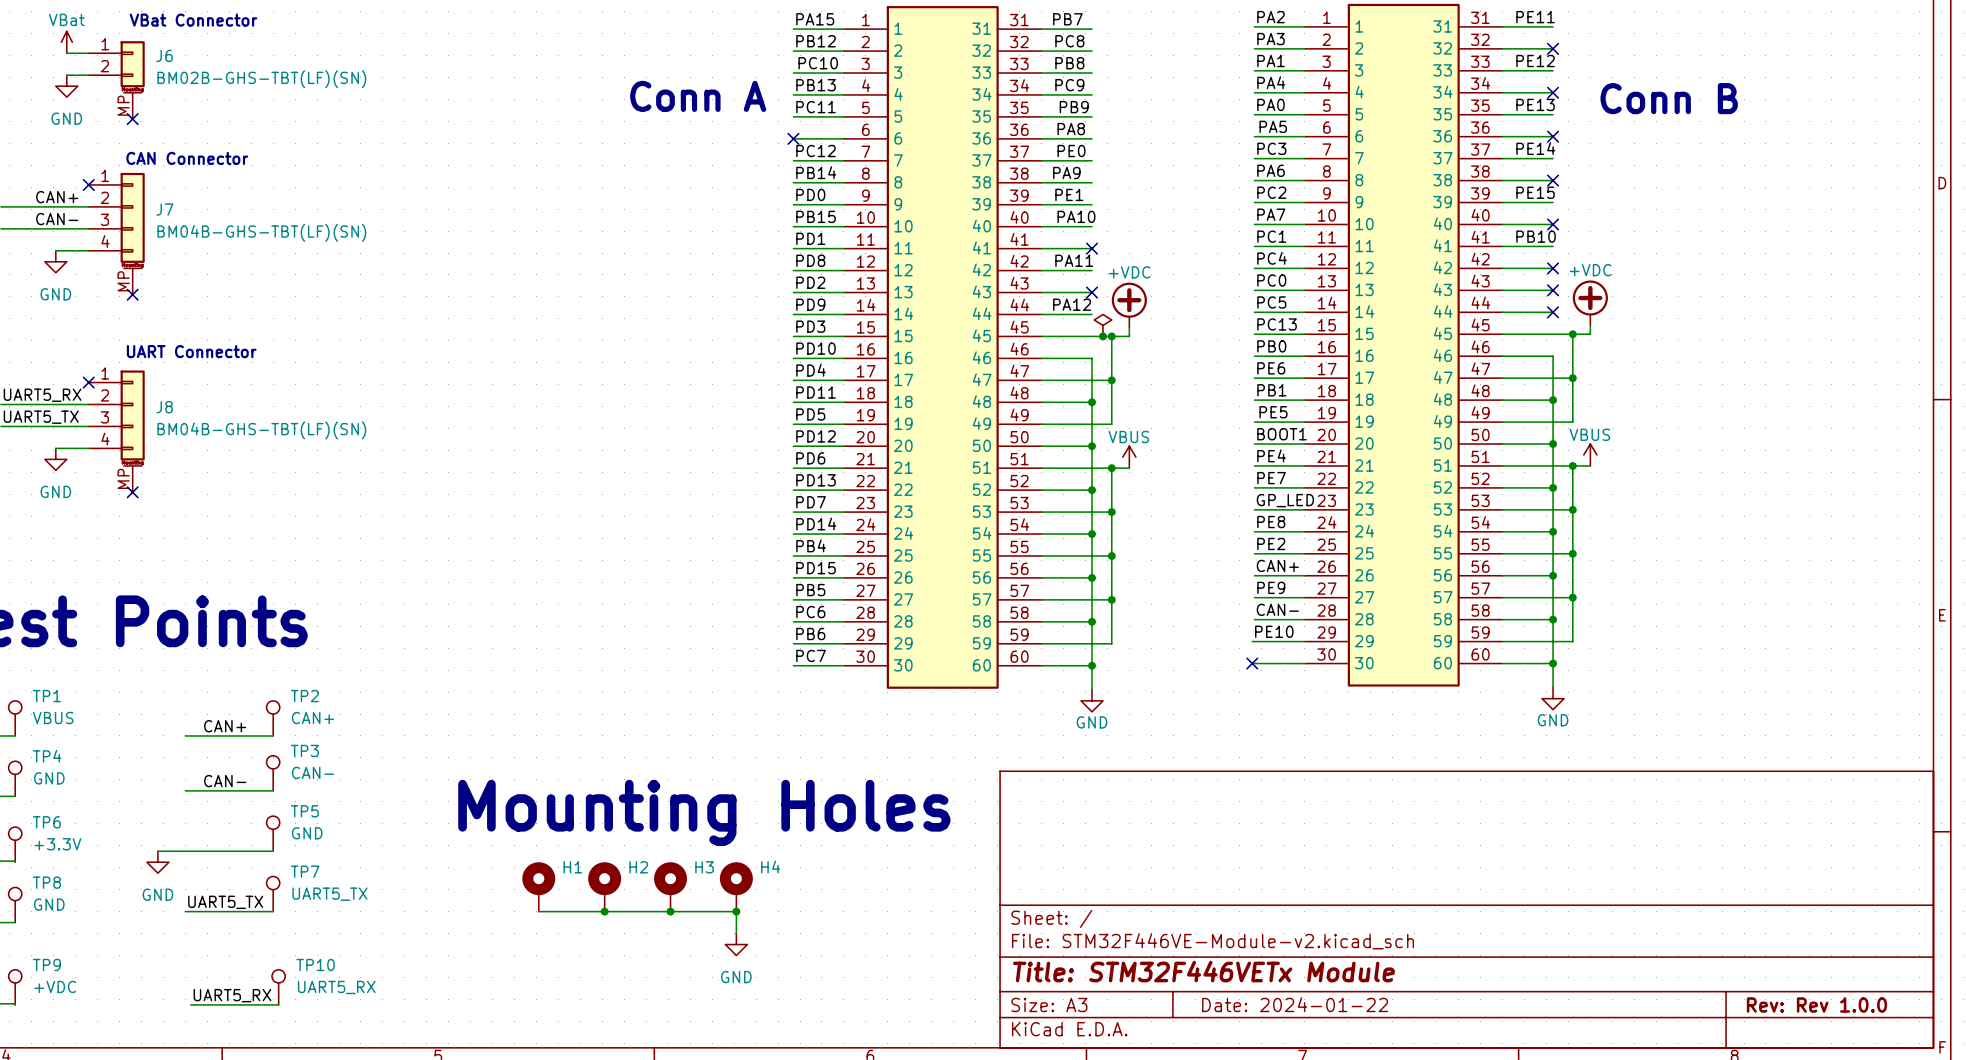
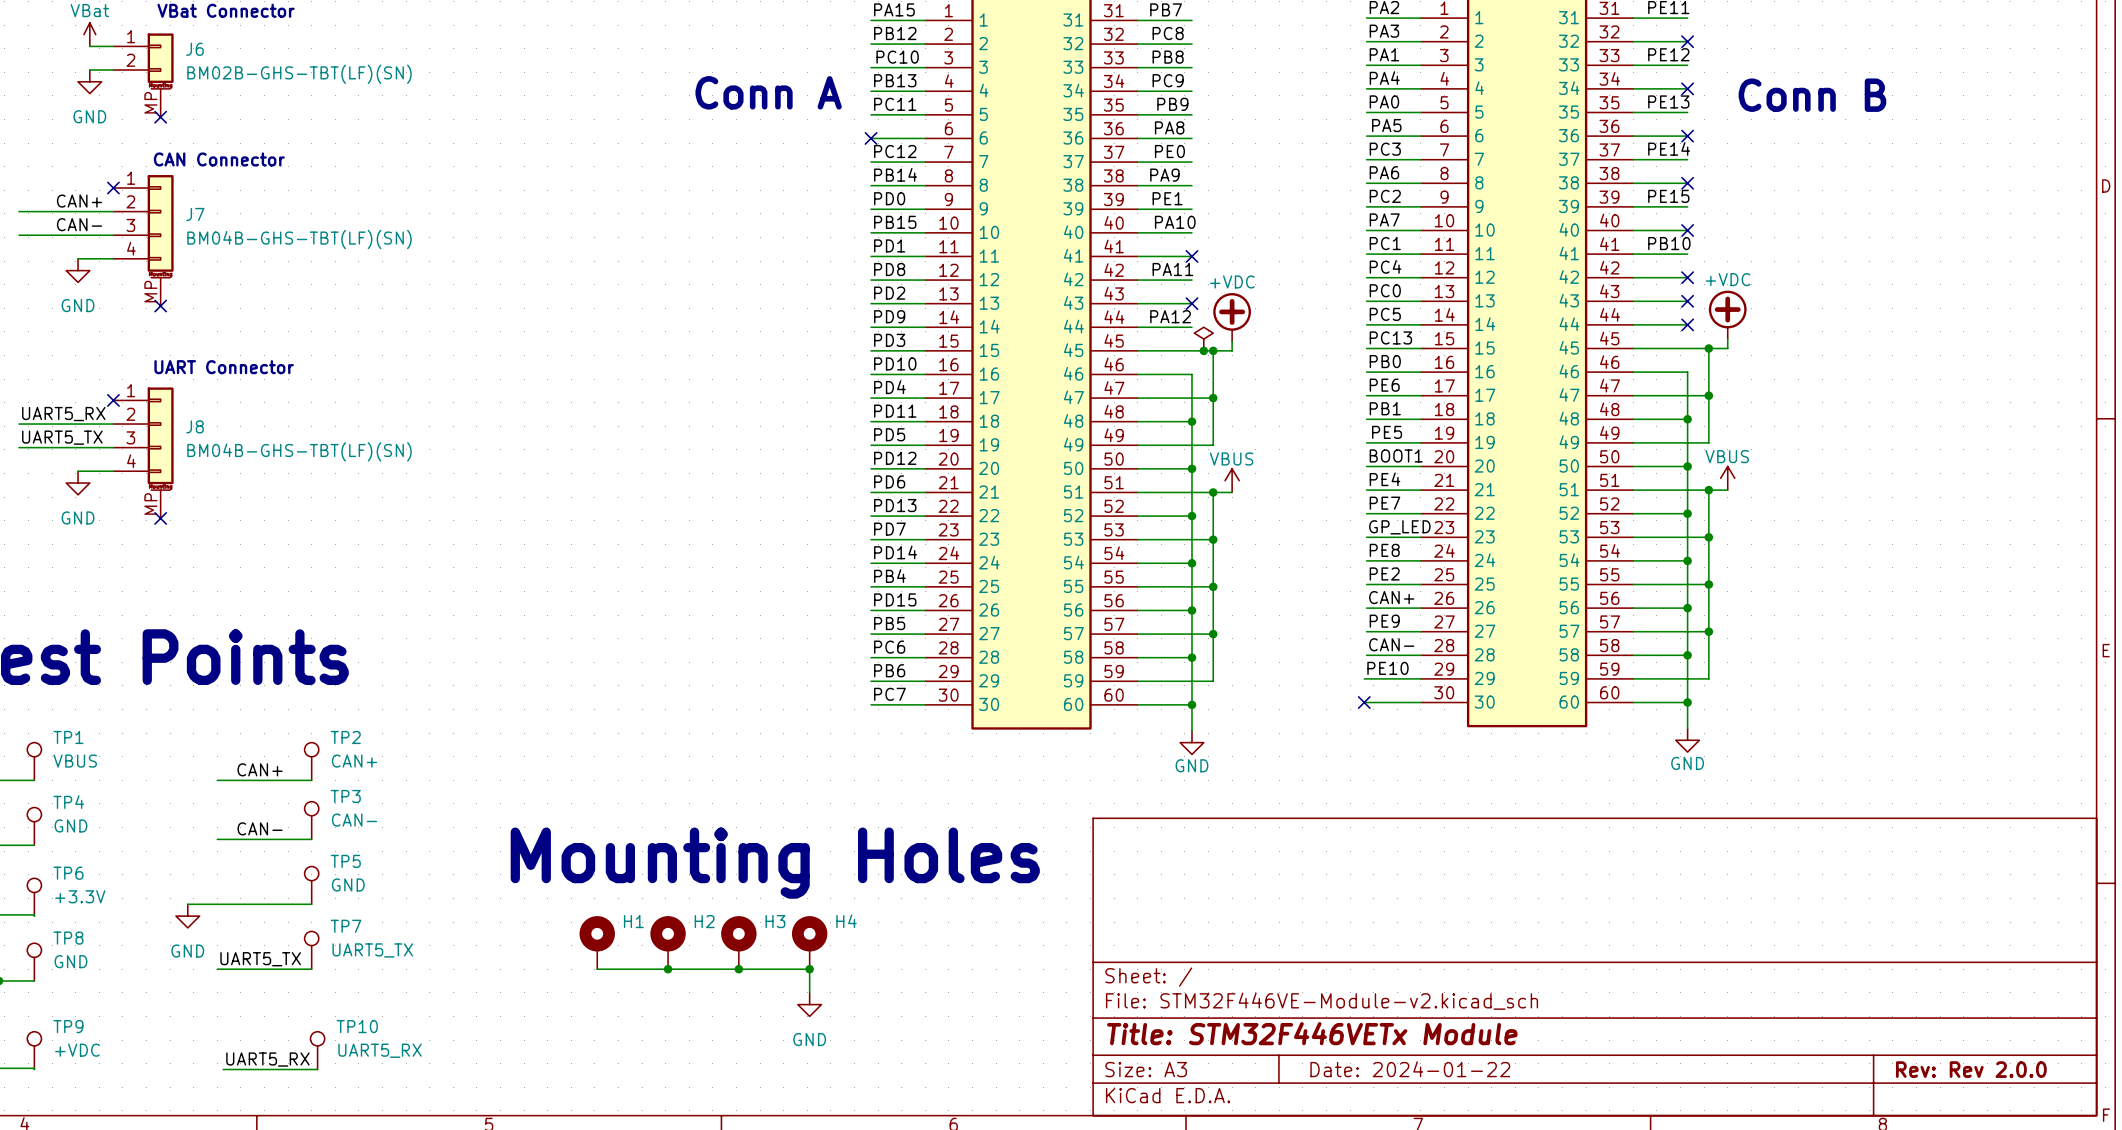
title block: Rev: Rev 1.0.0 (1816, 1005) -> Rev: Rev 2.0.0 (1971, 1069)

